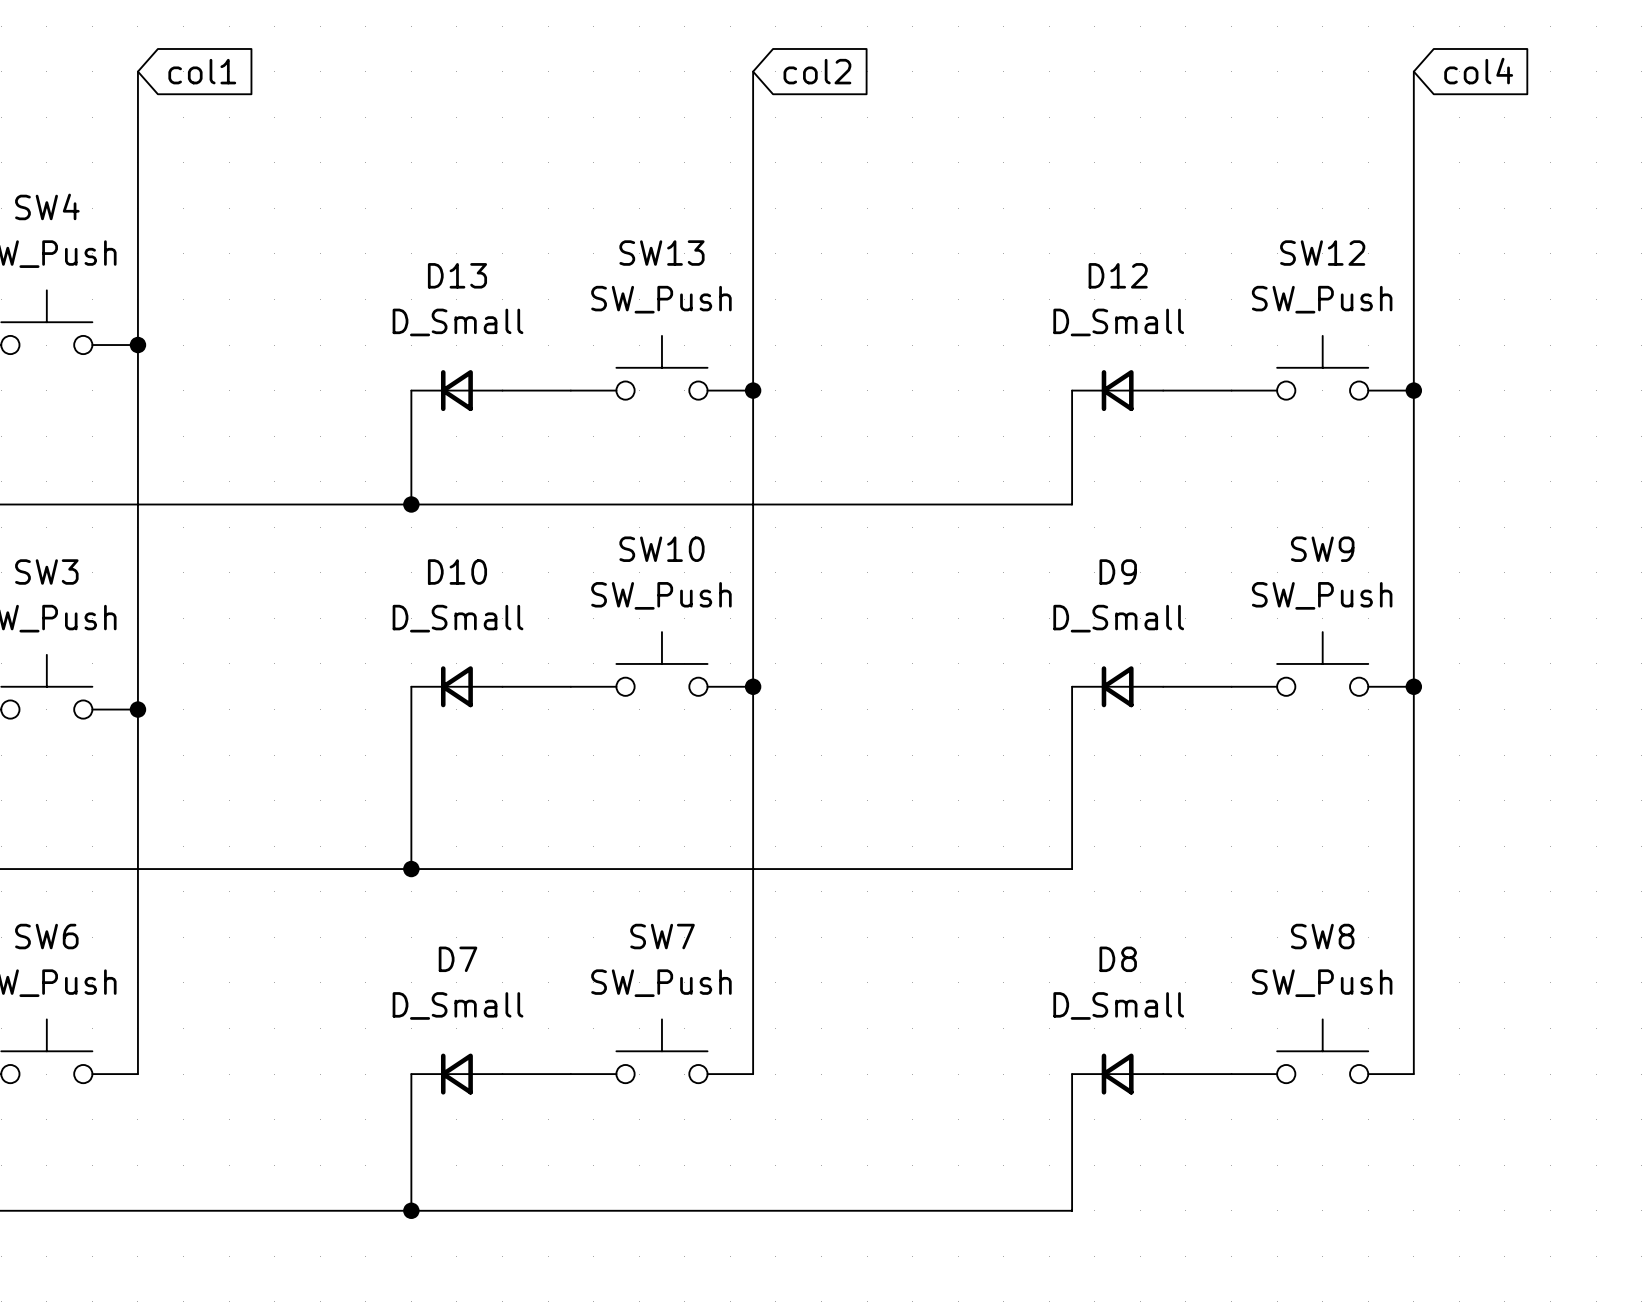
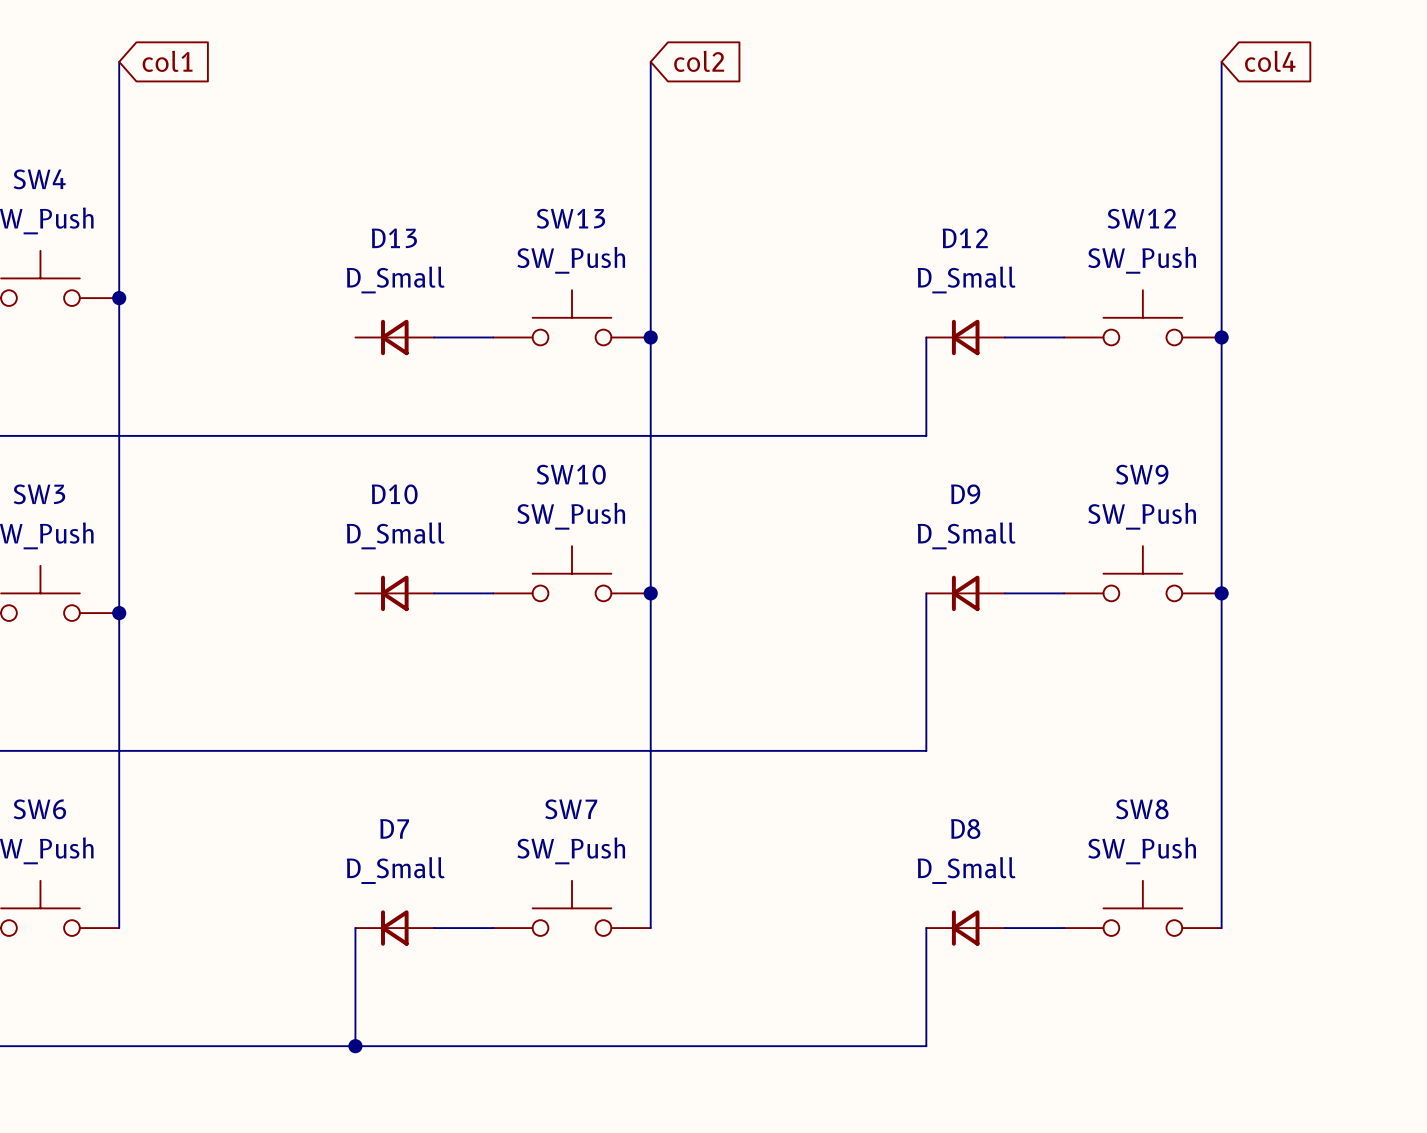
wire: (411, 390) (411, 504) -> none
junction: (411, 504) -> none
wire: (411, 686) (411, 869) -> none
junction: (411, 869) -> none

